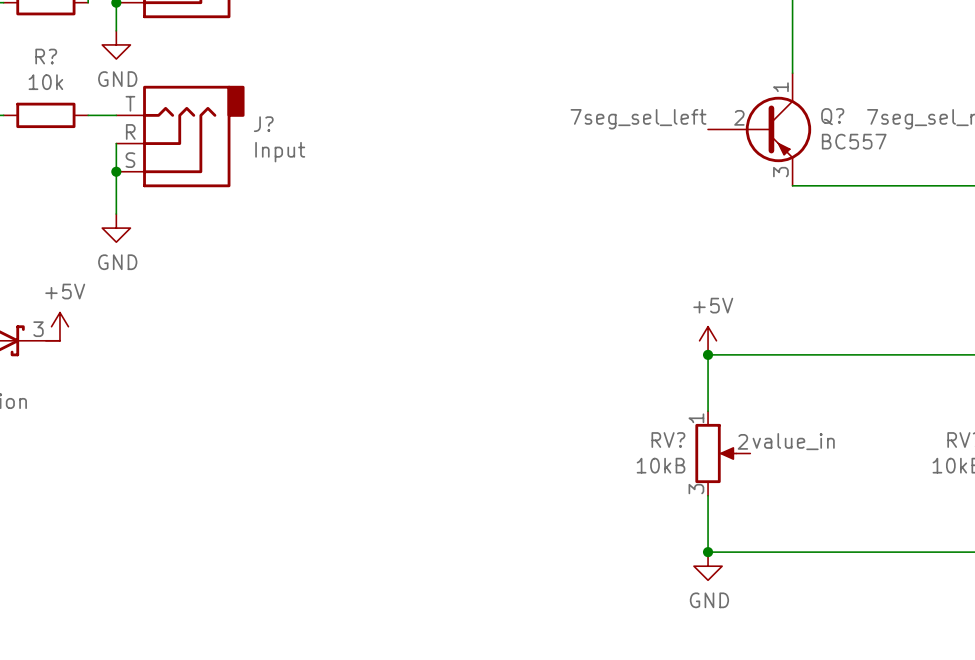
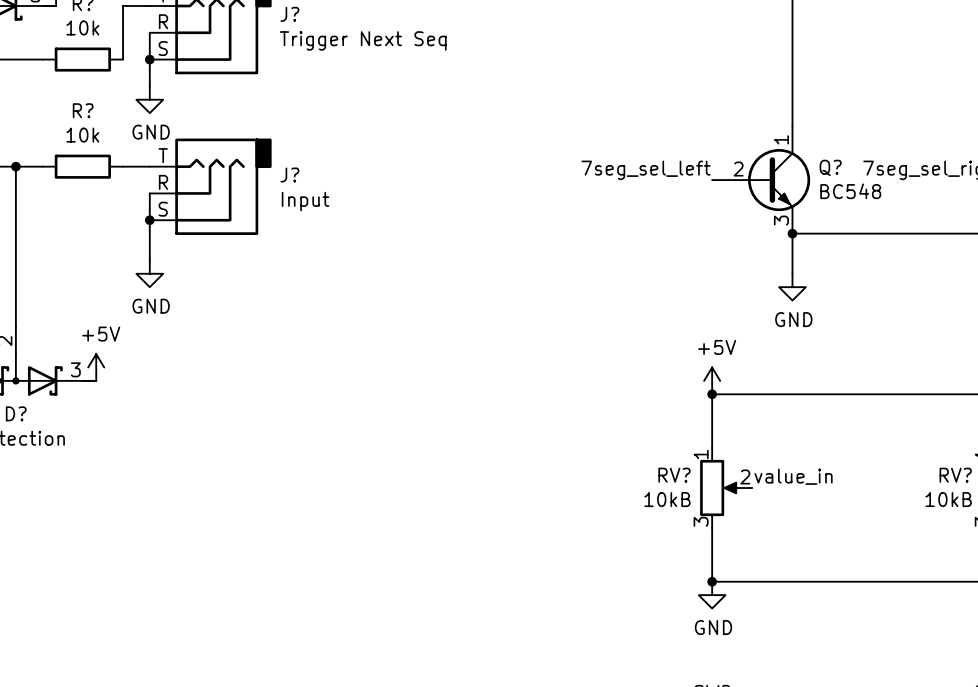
Q? symbol: [708, 73, 812, 186] -> [712, 126, 811, 234]
Q? value: BC557 (854, 141) -> BC548 (850, 191)
wire: none -> (792, 233) (792, 273)
junction: none -> (792, 233)
power symbol: none -> GND (792, 287)

